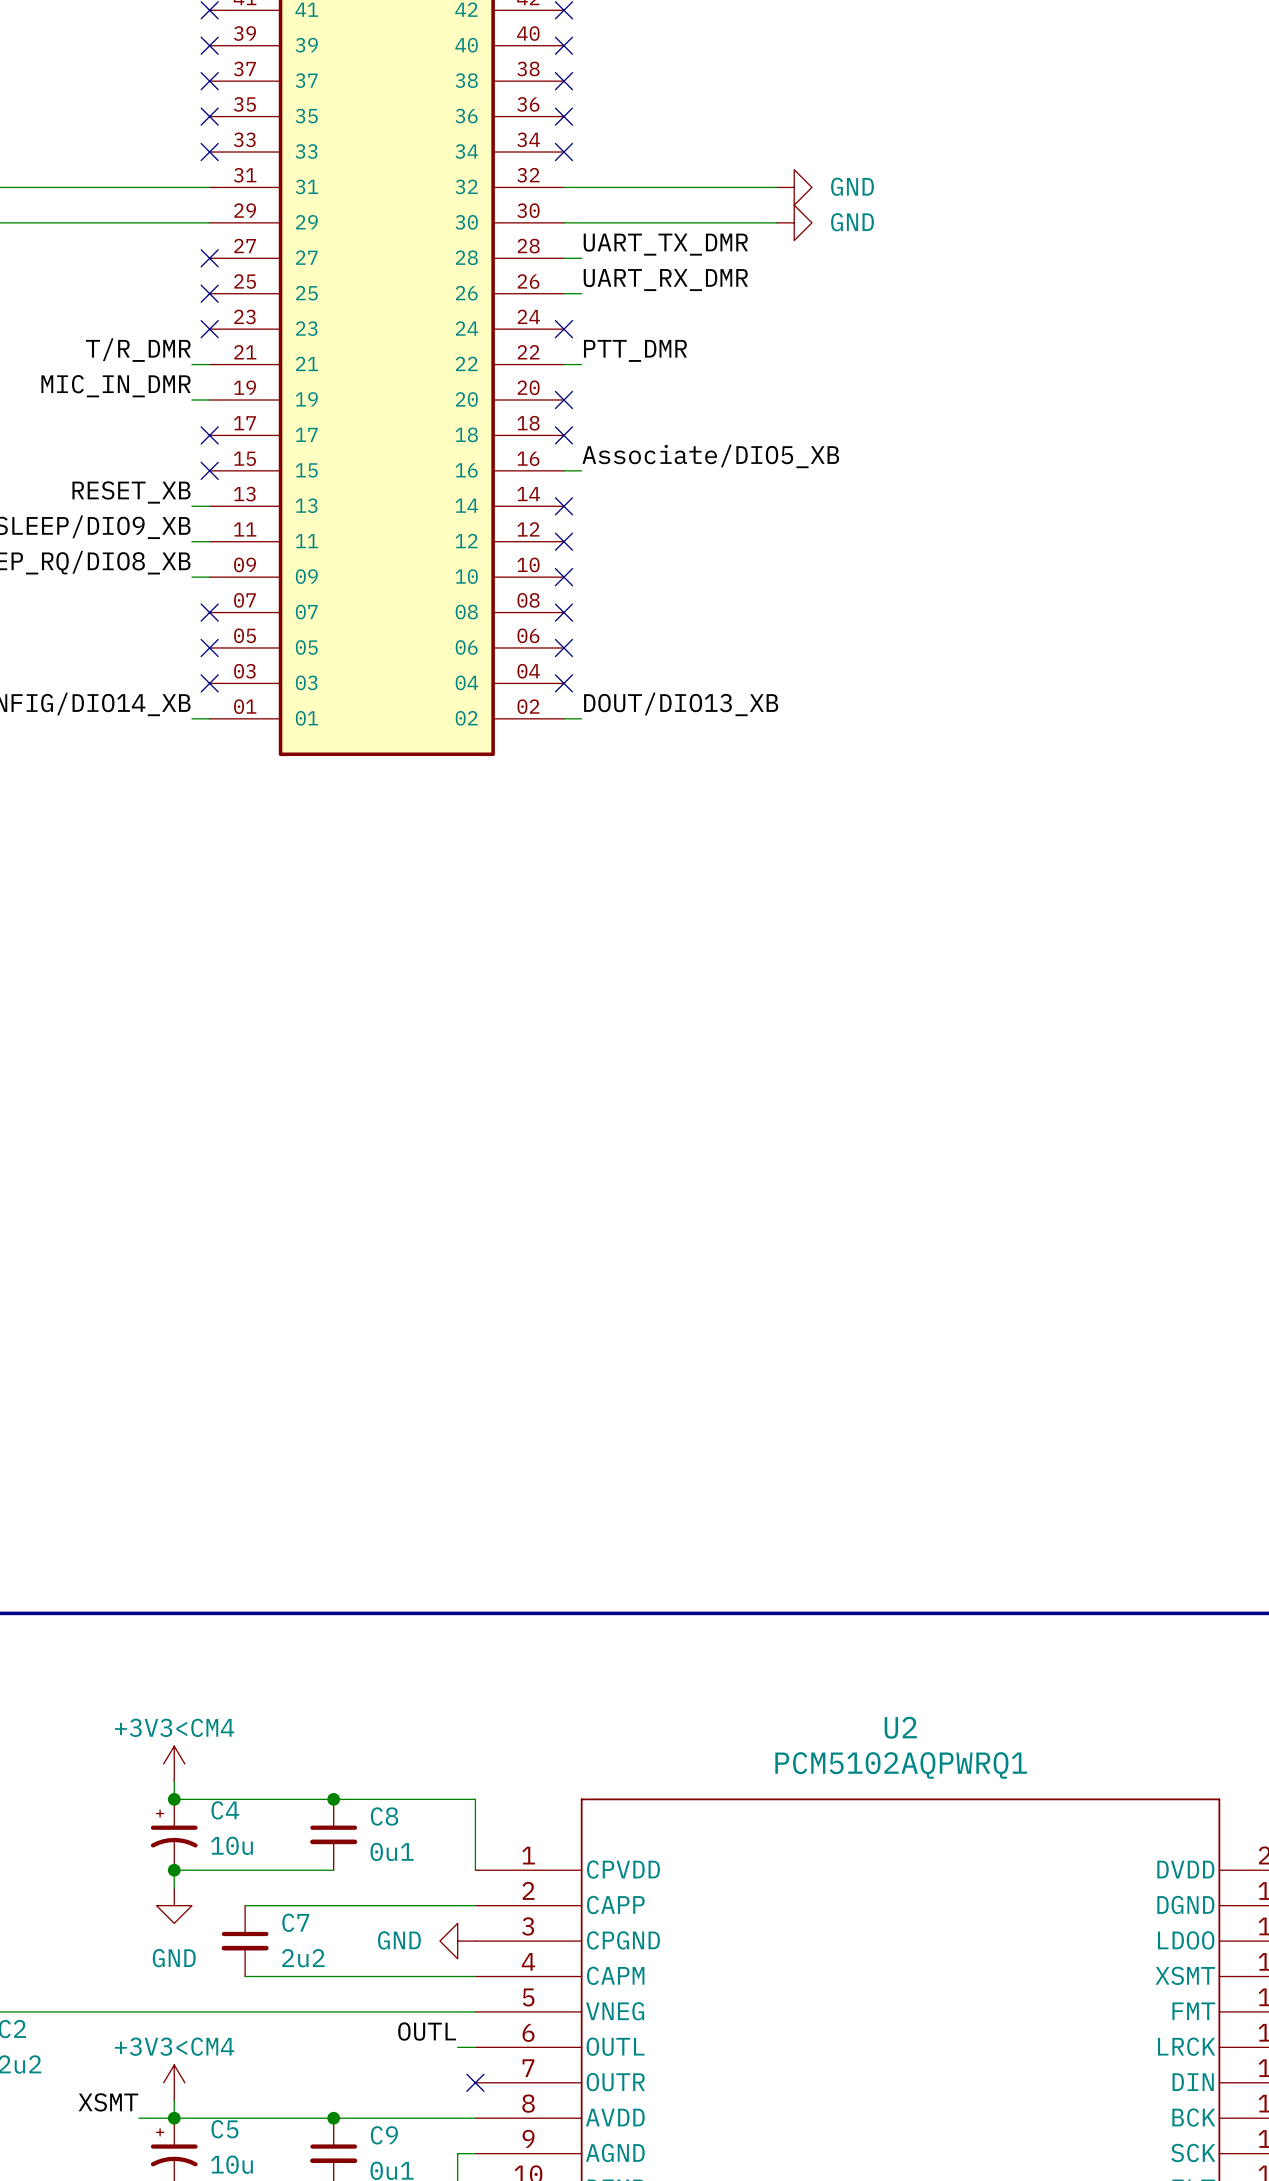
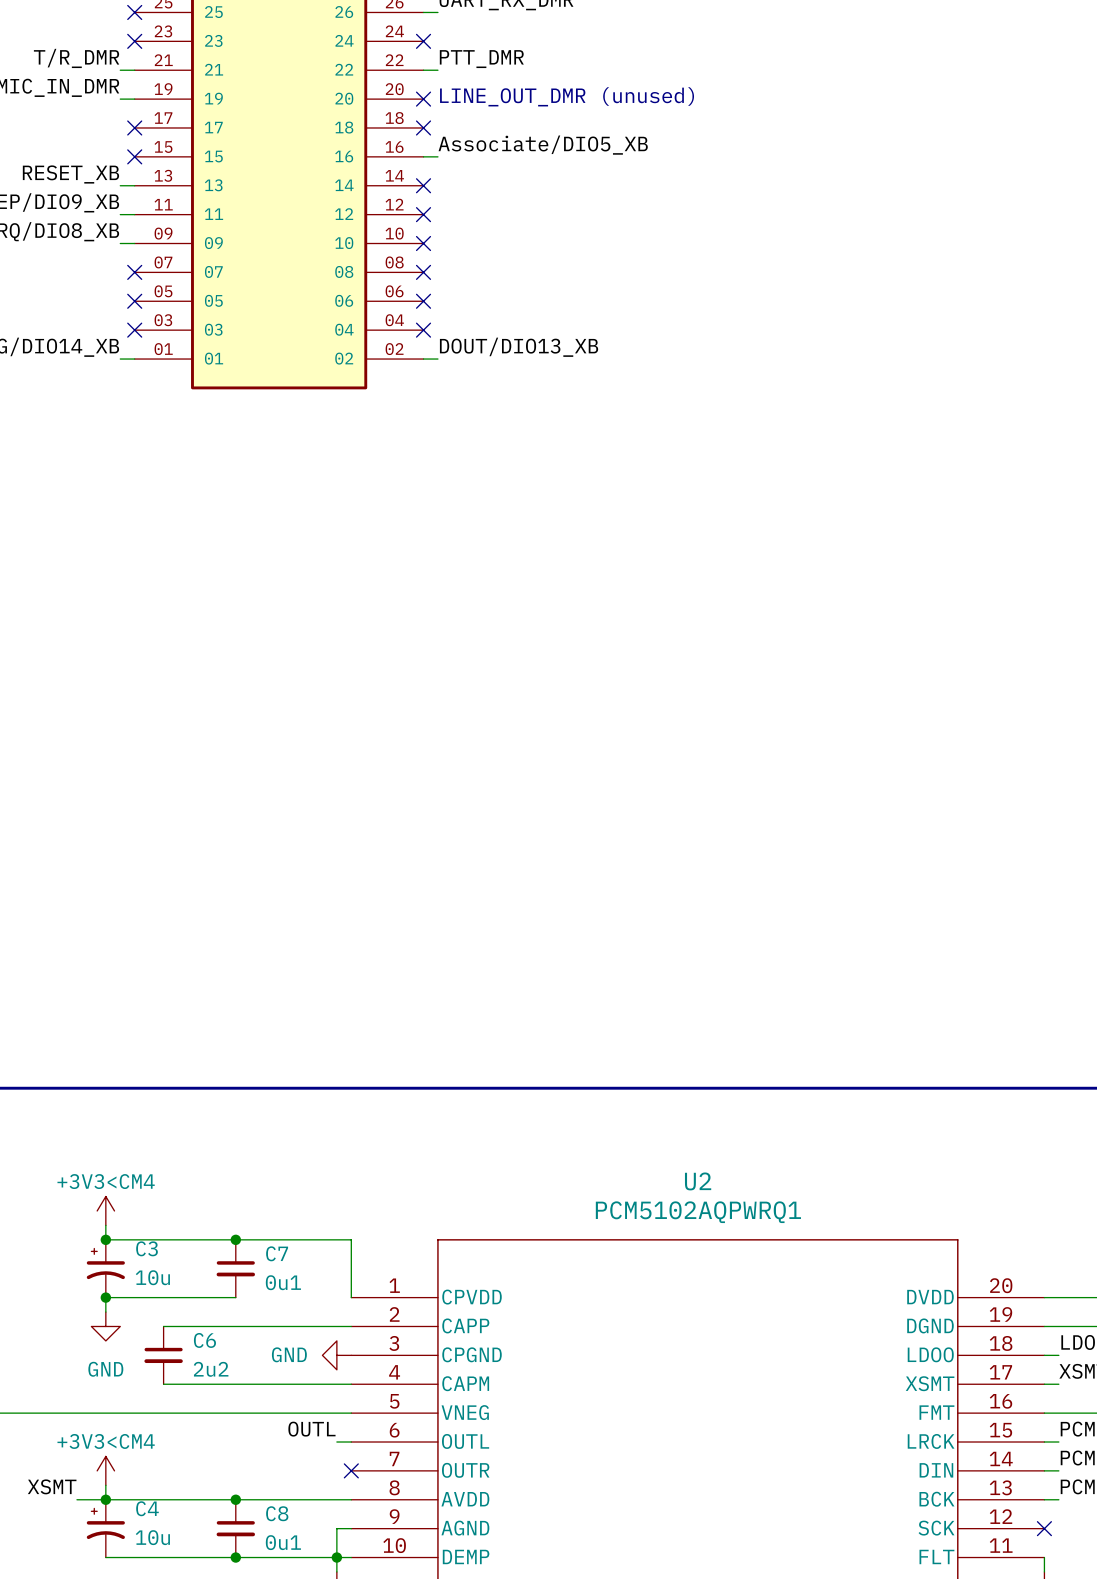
text: none -> LINE_OUT_DMR (unused) (567, 96)
C4 name: C4 (225, 1810) -> C3 (147, 1248)
C8 name: C8 (384, 1816) -> C7 (277, 1253)
C7 name: C7 (295, 1922) -> C6 (204, 1340)
C5 name: C5 (224, 2129) -> C4 (147, 1508)
C9 name: C9 (384, 2135) -> C8 (277, 1513)

